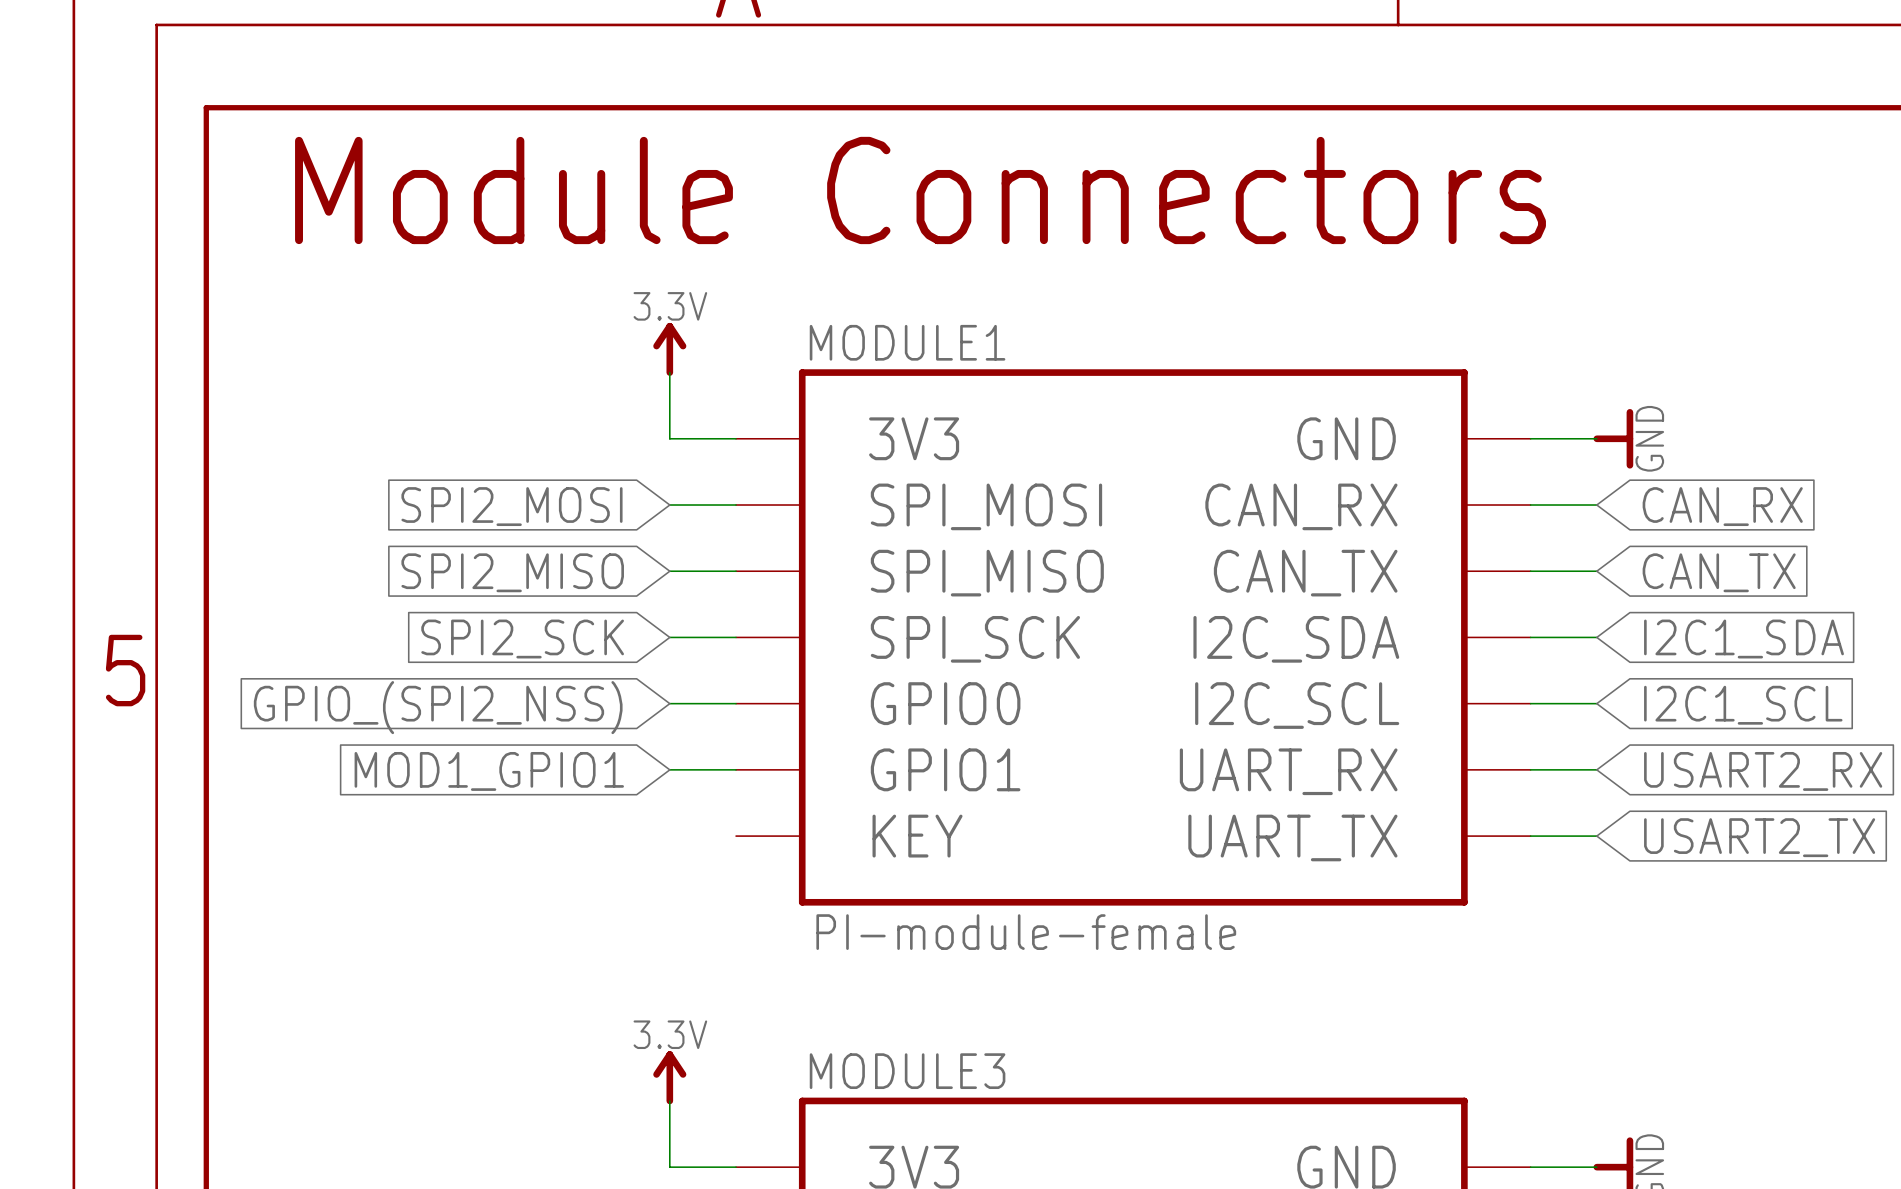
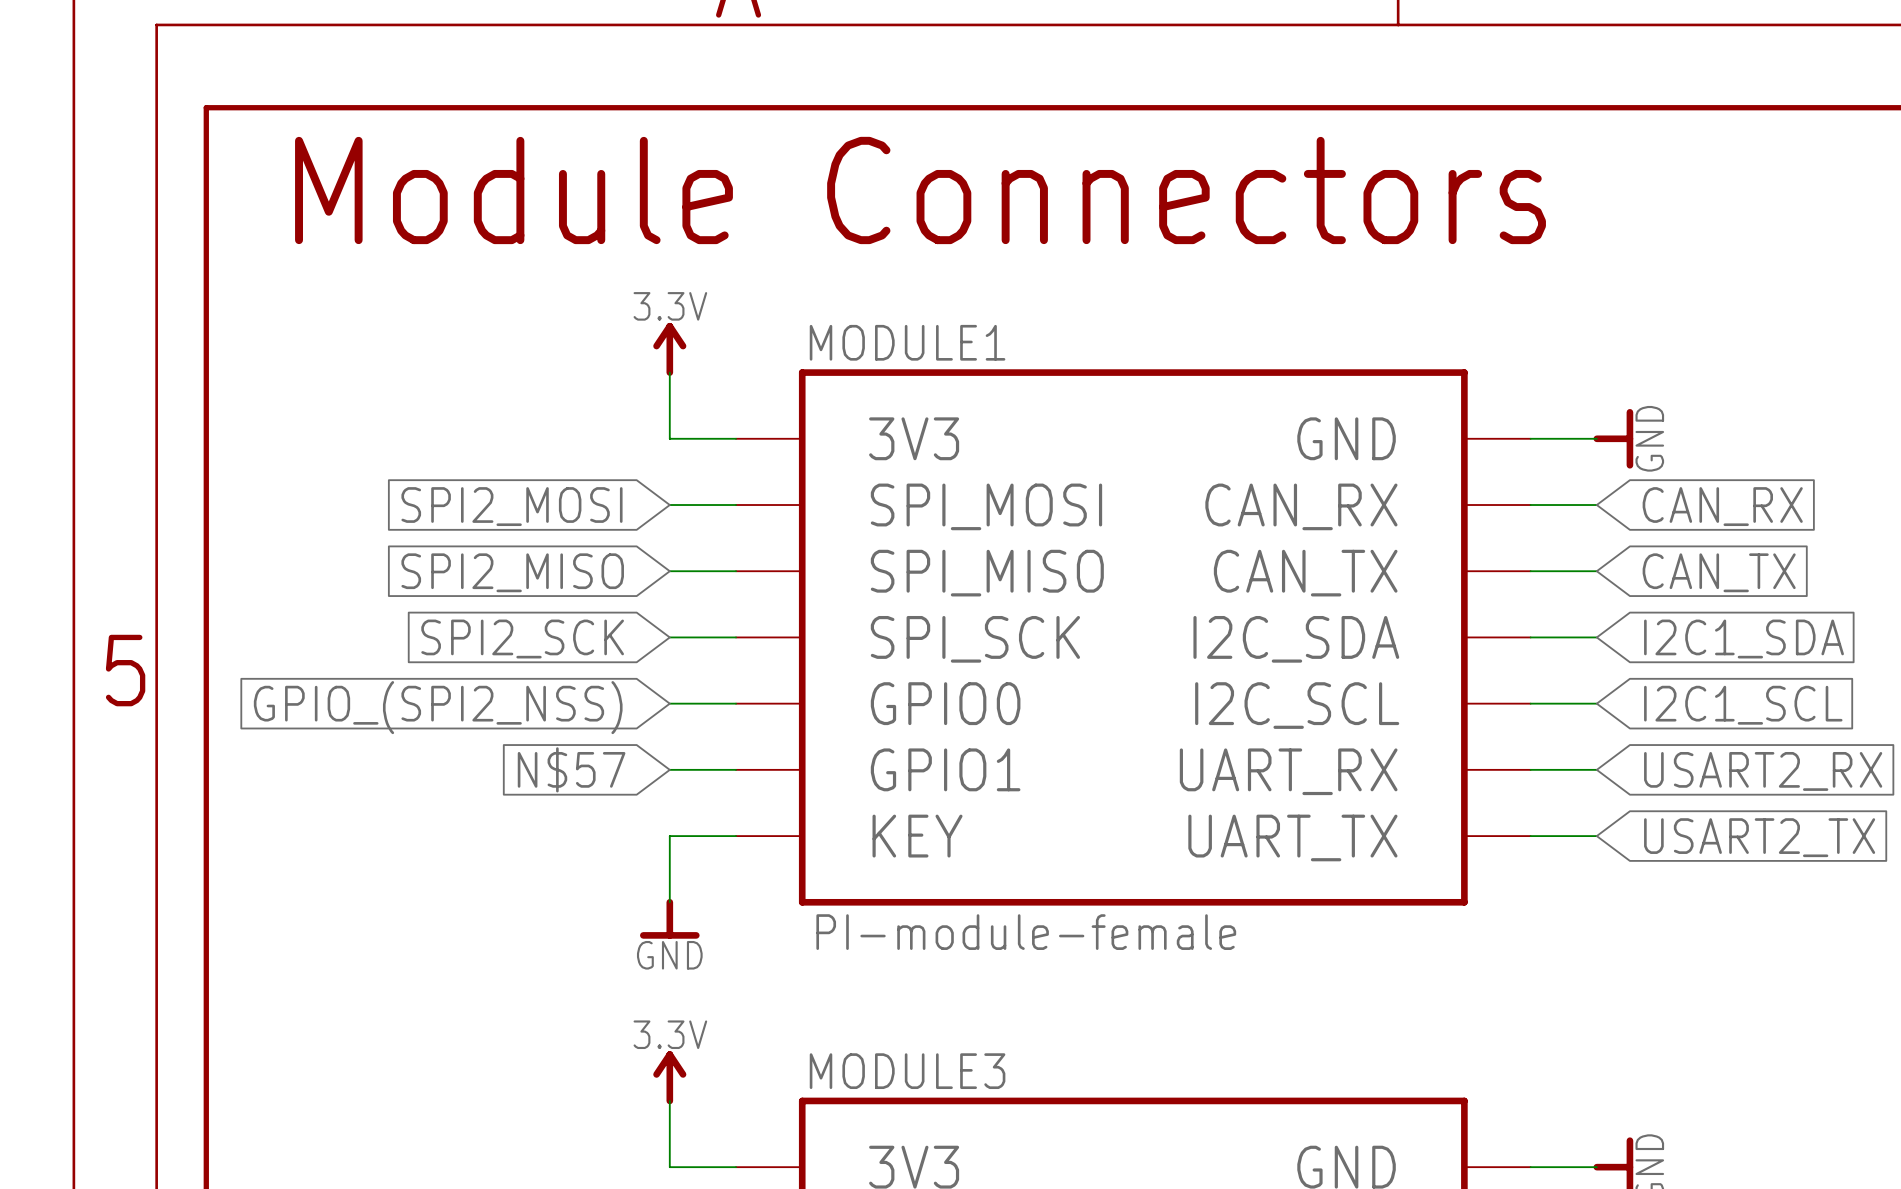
global label: MOD1_GPIO1 (489, 771) -> N$57 (571, 769)
wire: none -> (736, 836) (669, 836) (669, 902)
power symbol: none -> GND (669, 918)

